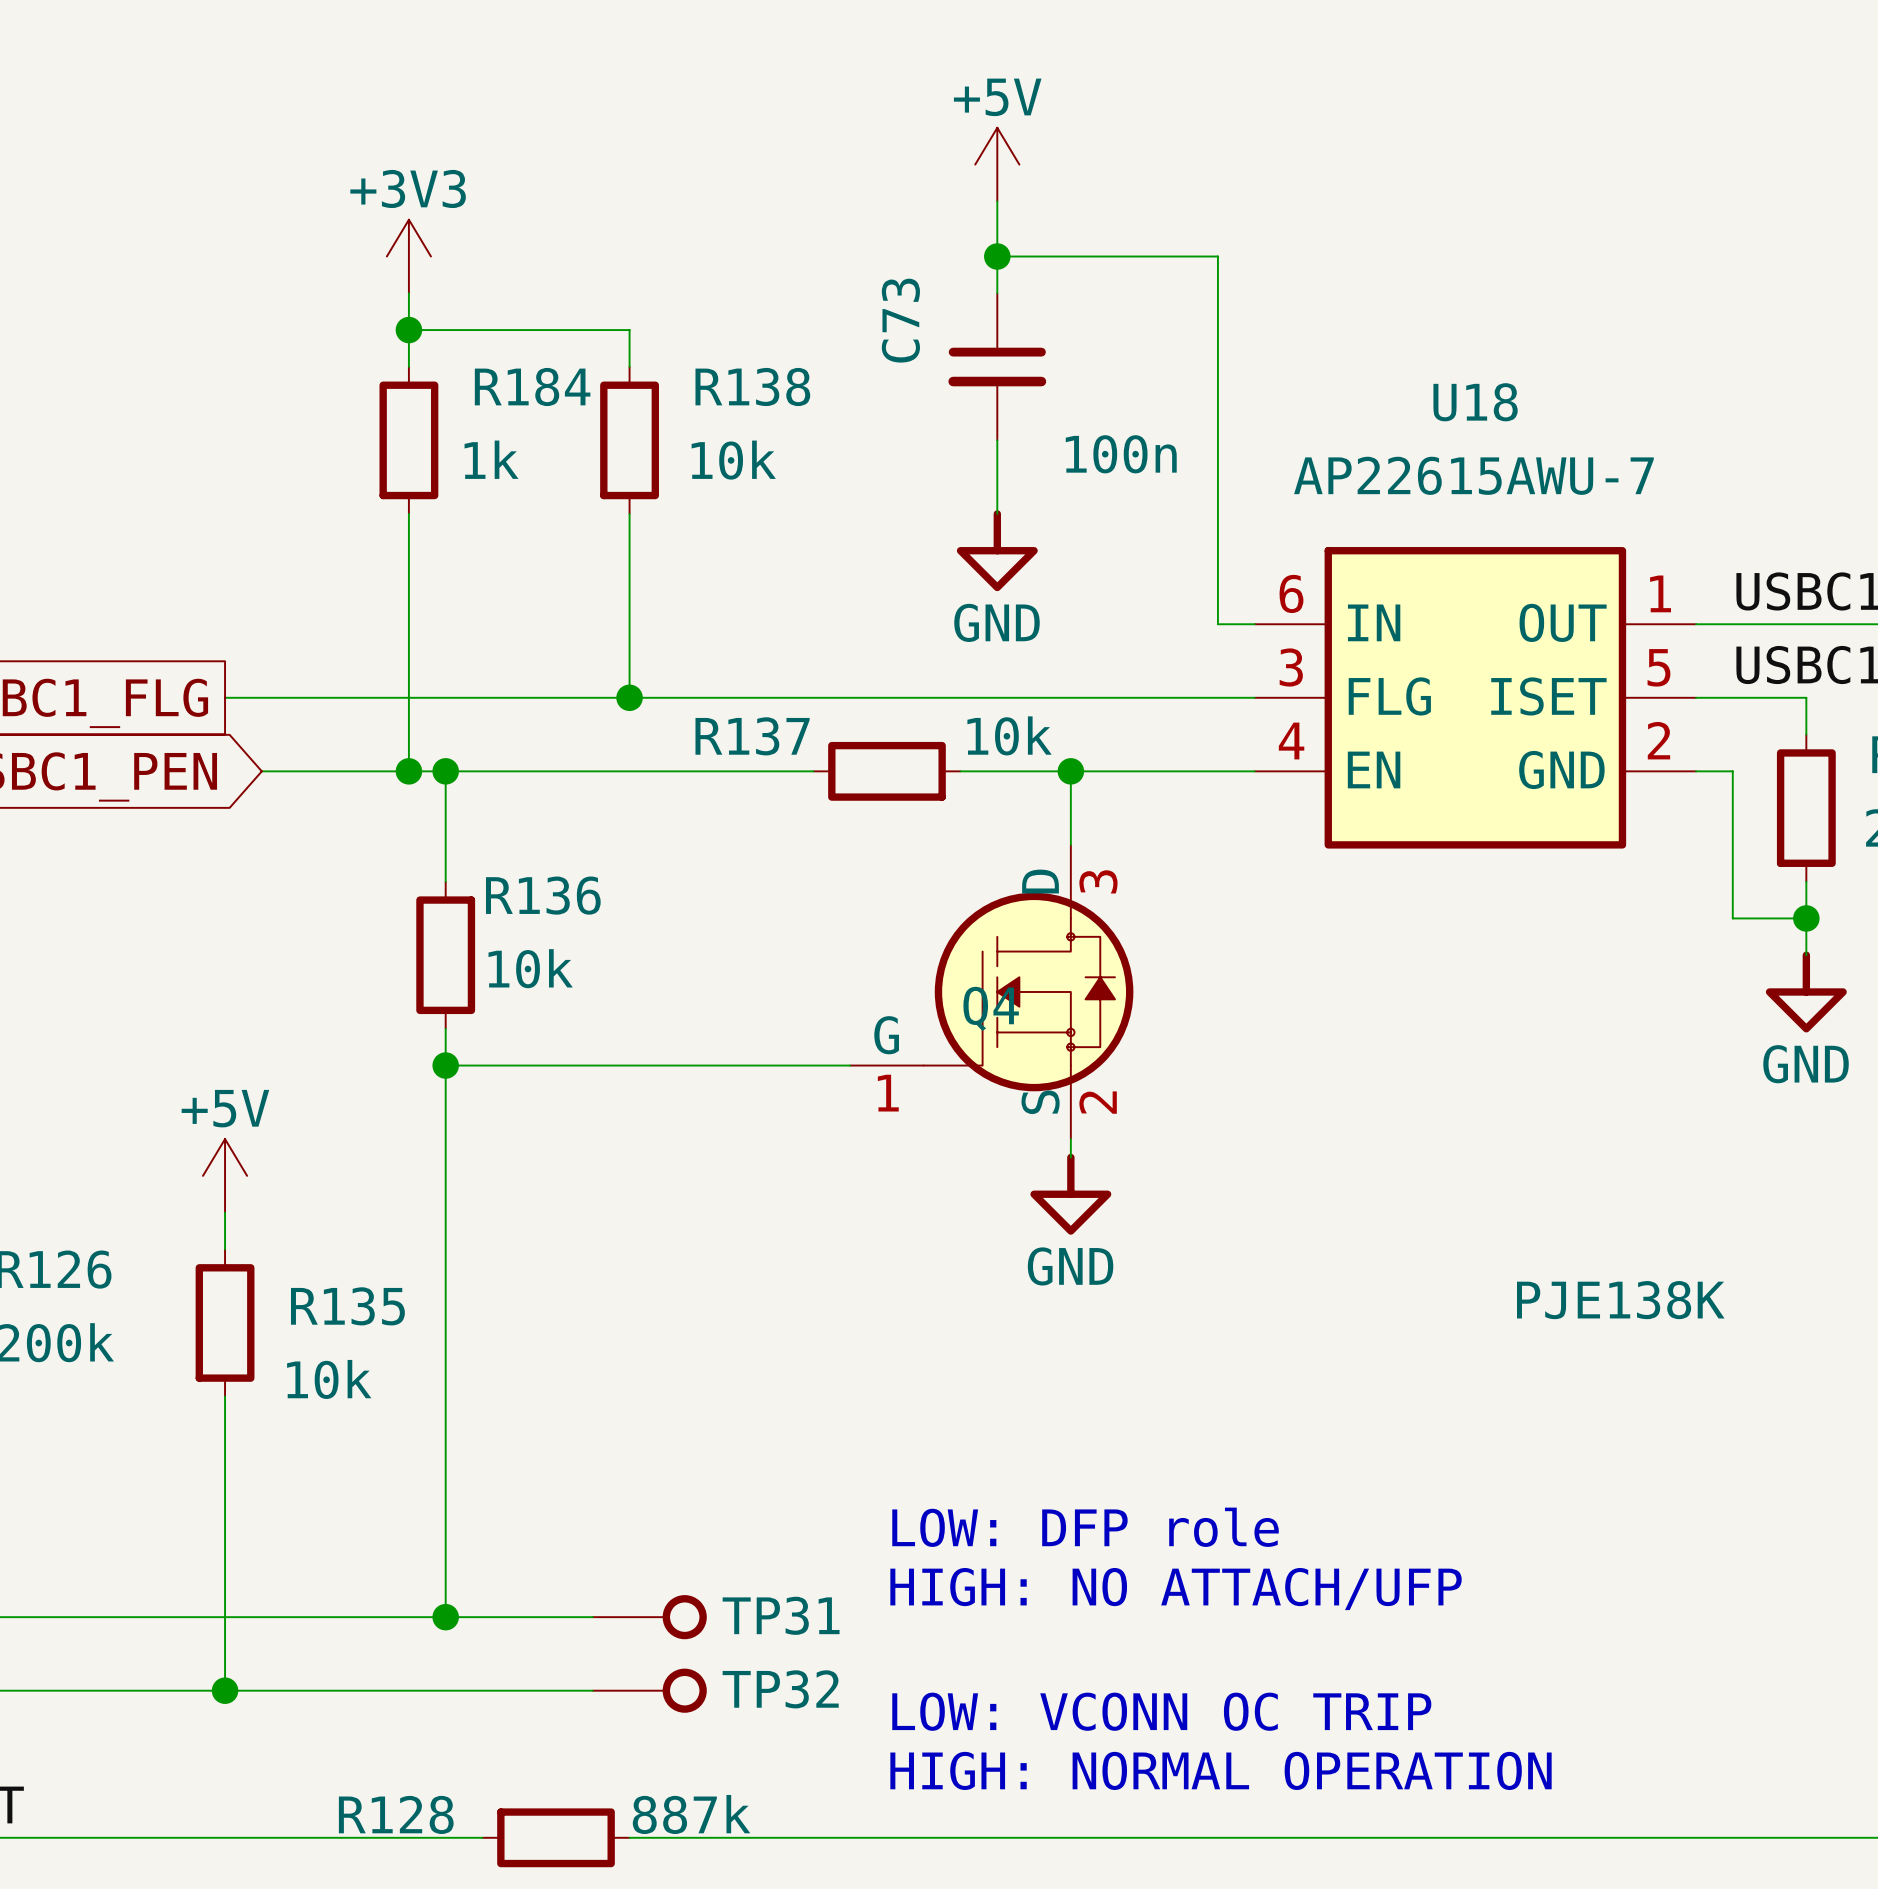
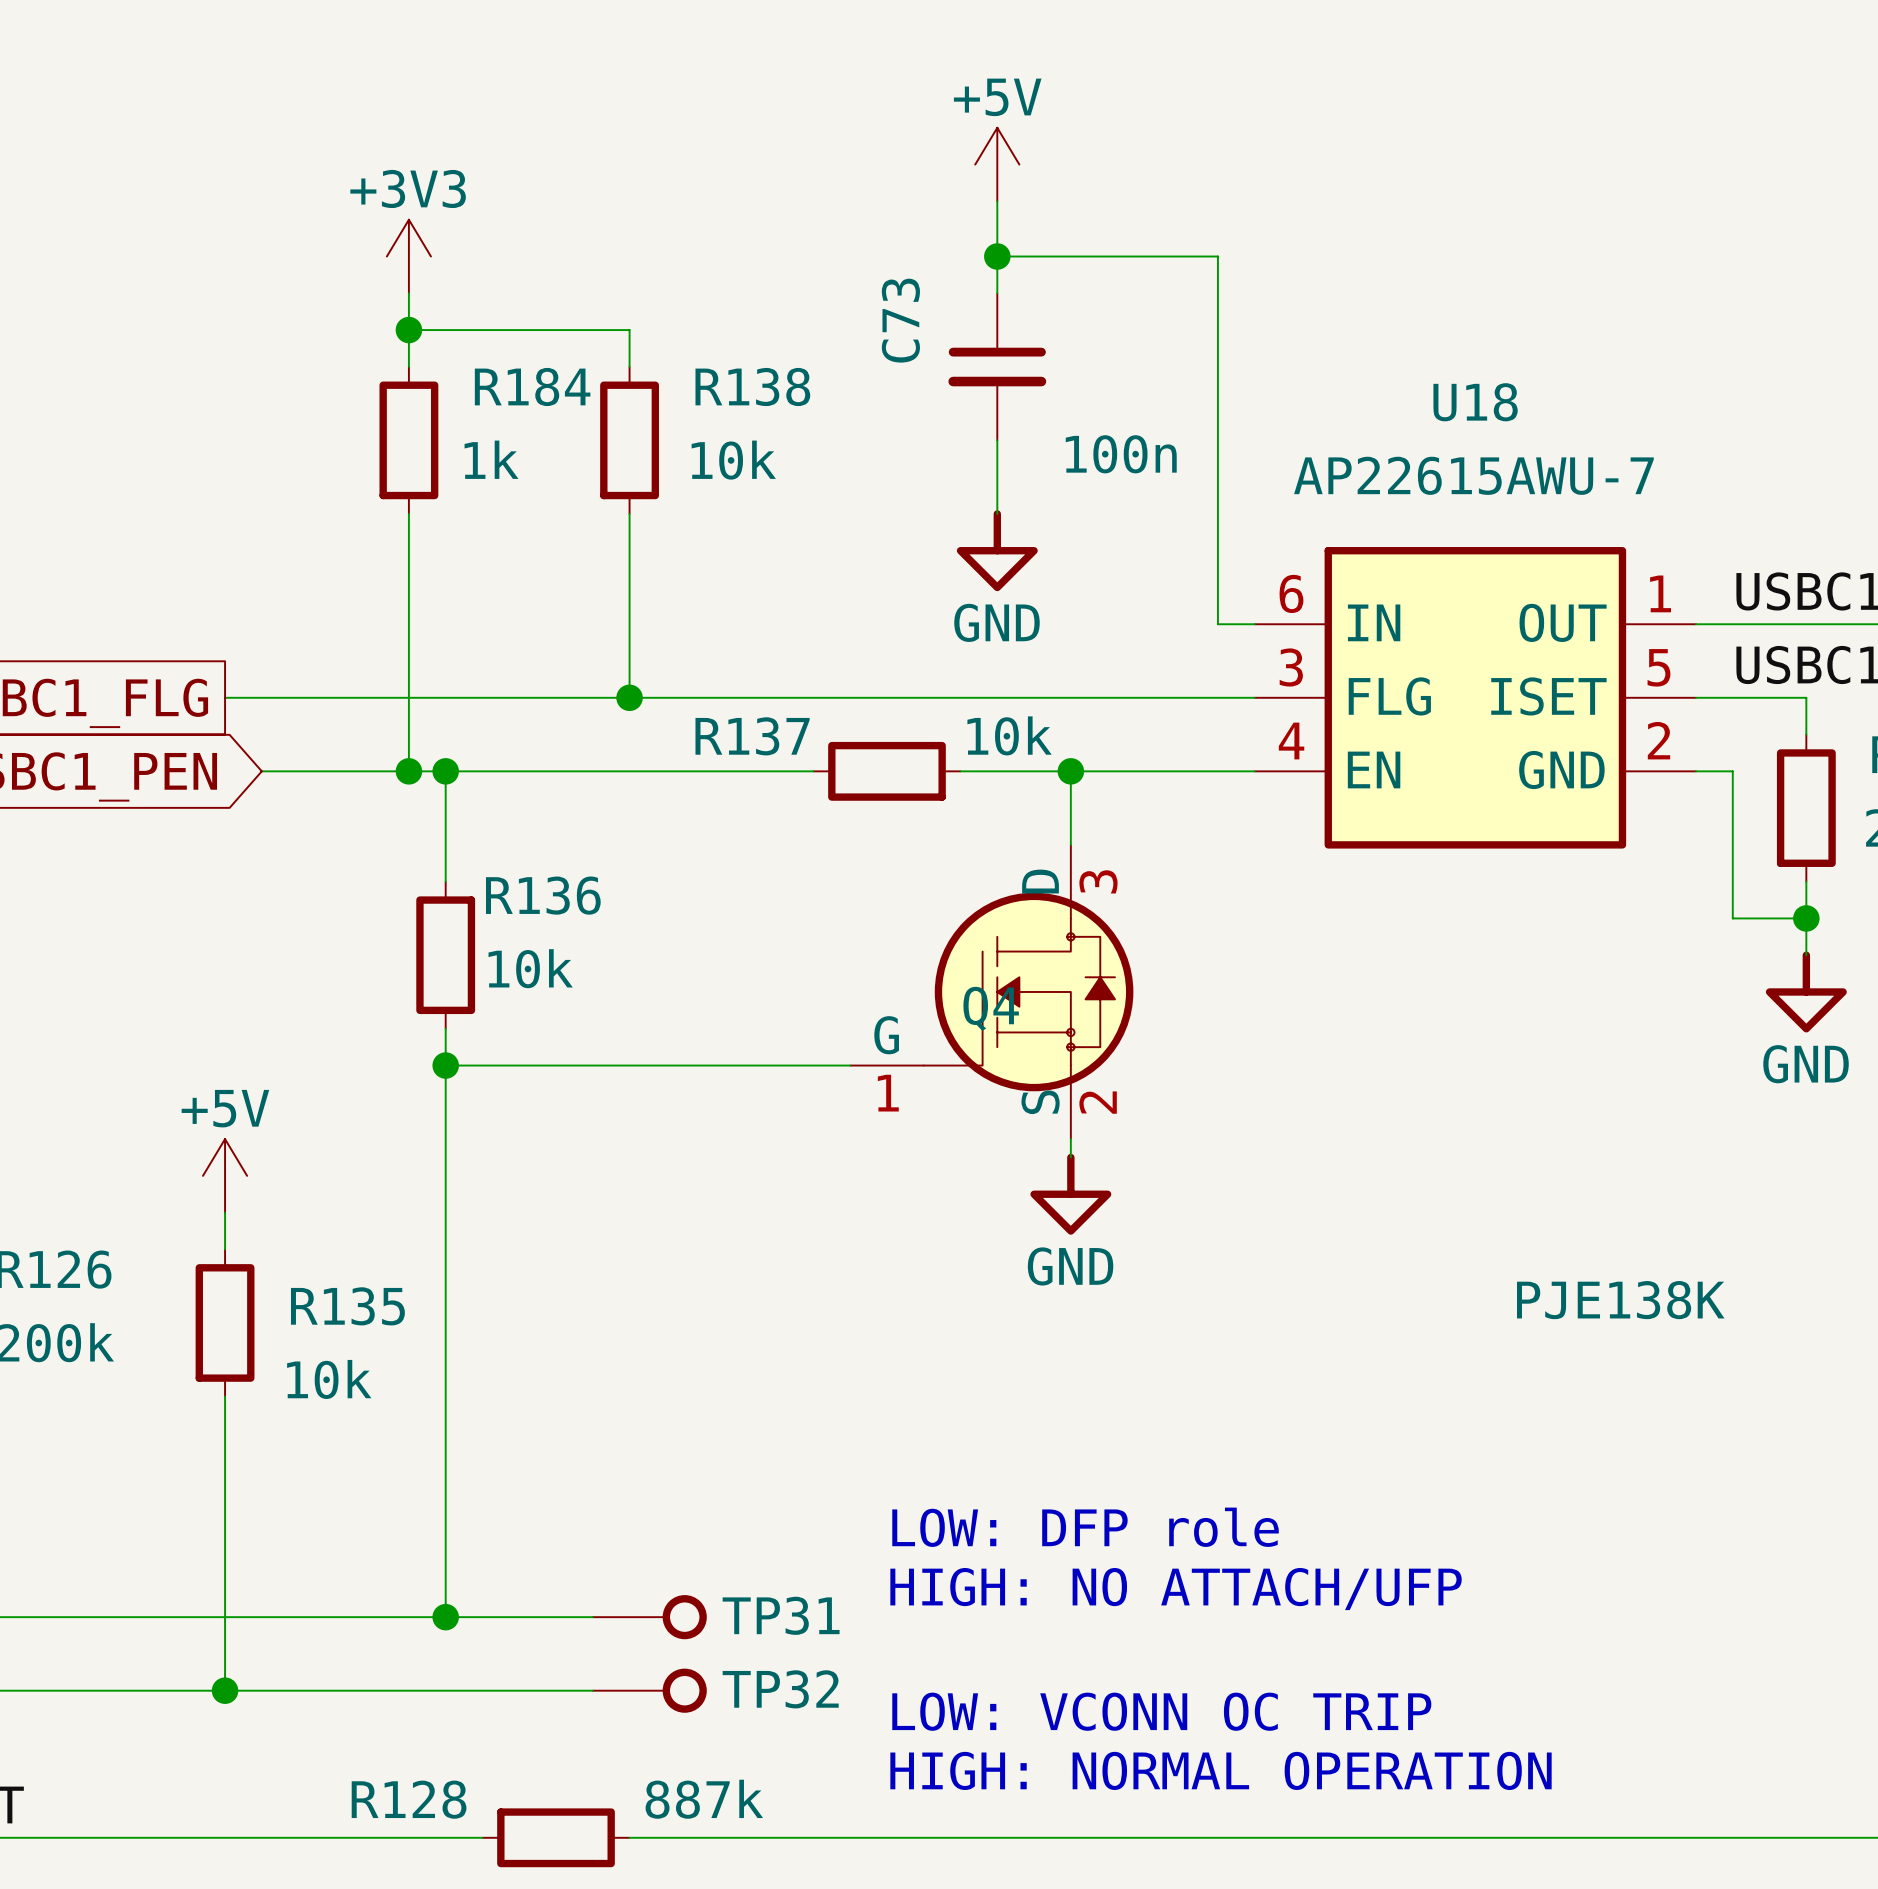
R128 name position: R128 (396, 1814) -> R128 (409, 1799)
R128 text position: 887k (691, 1814) -> 887k (704, 1799)

